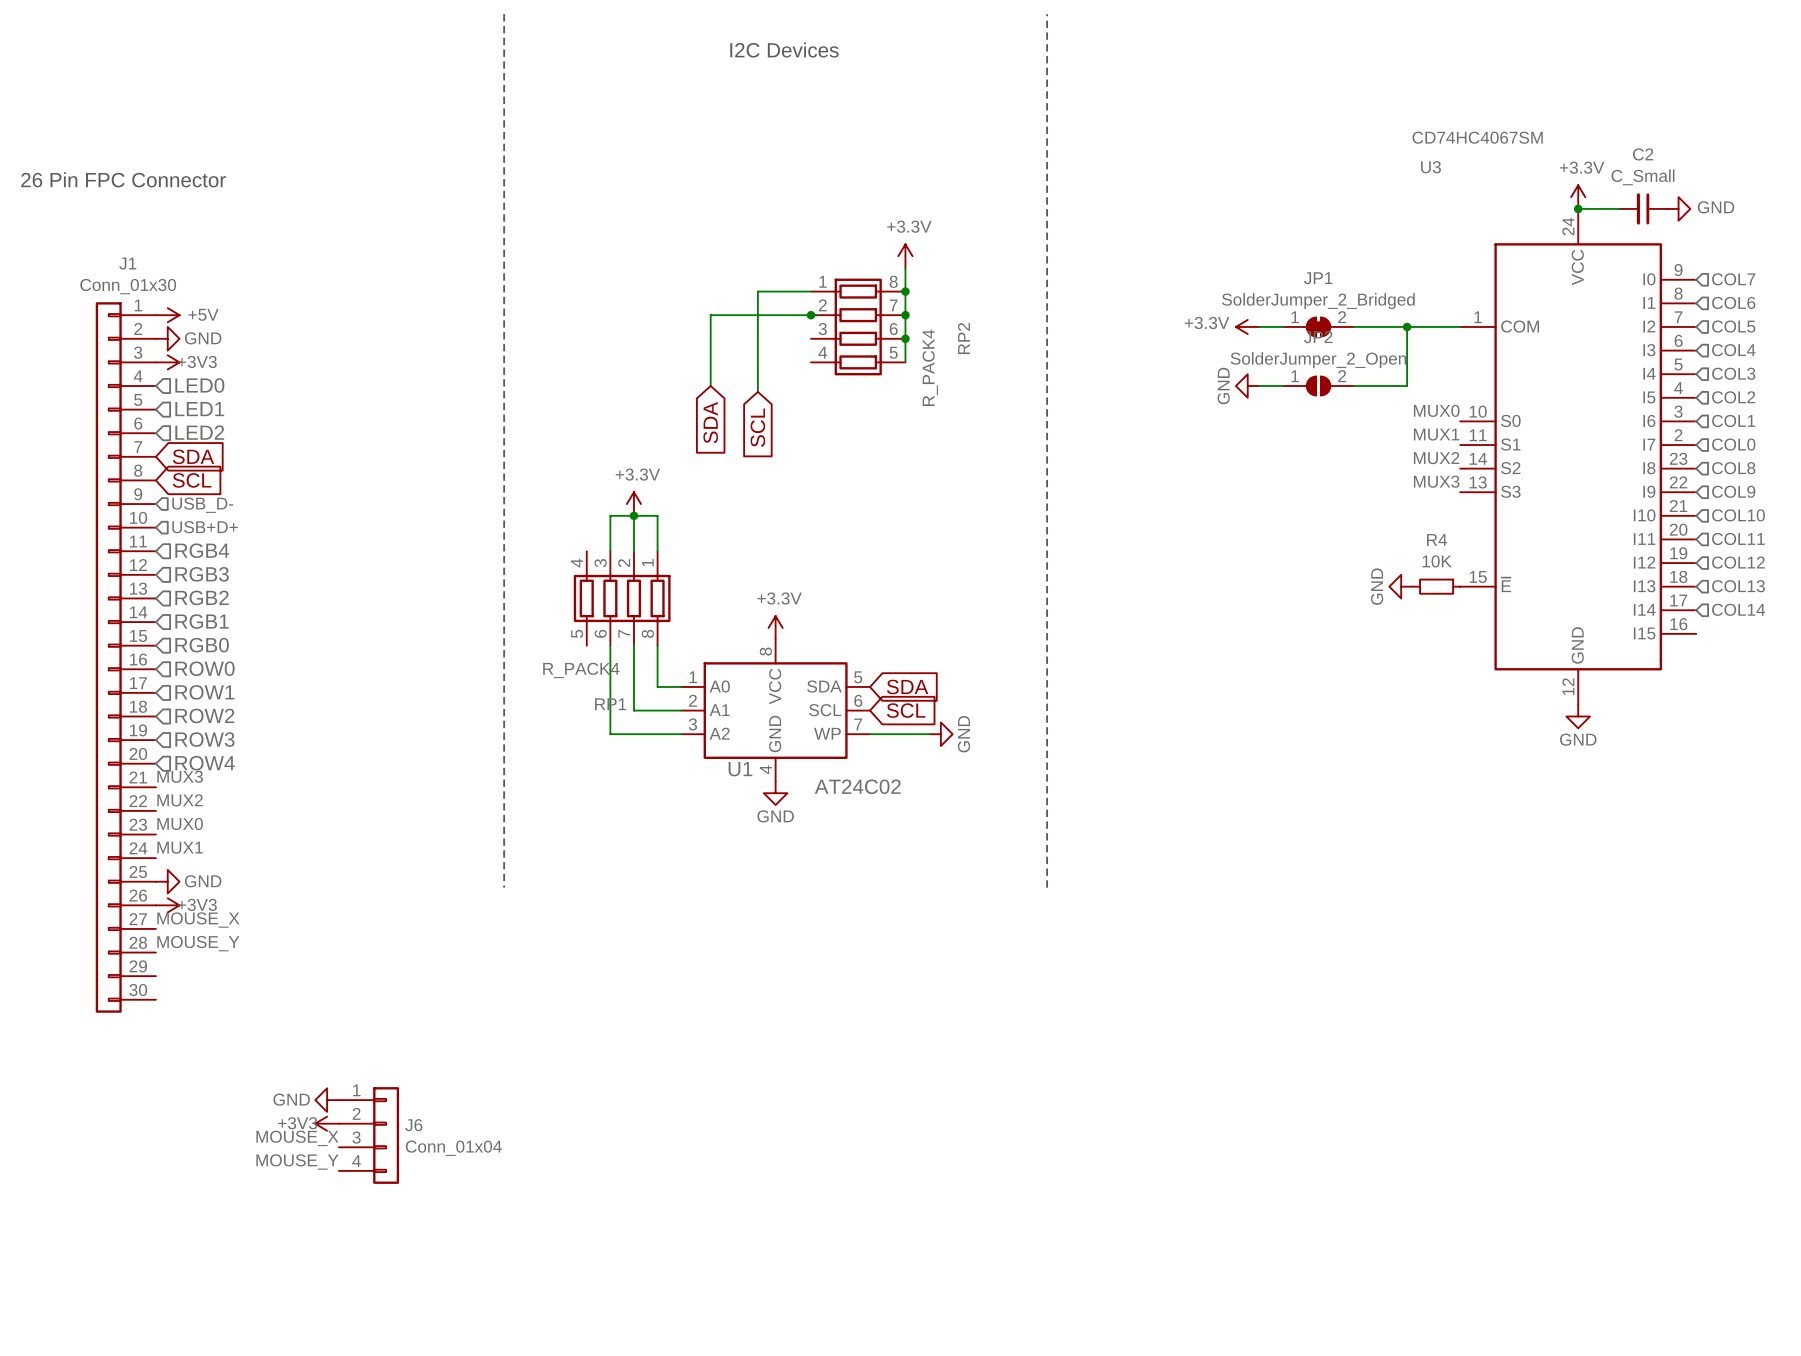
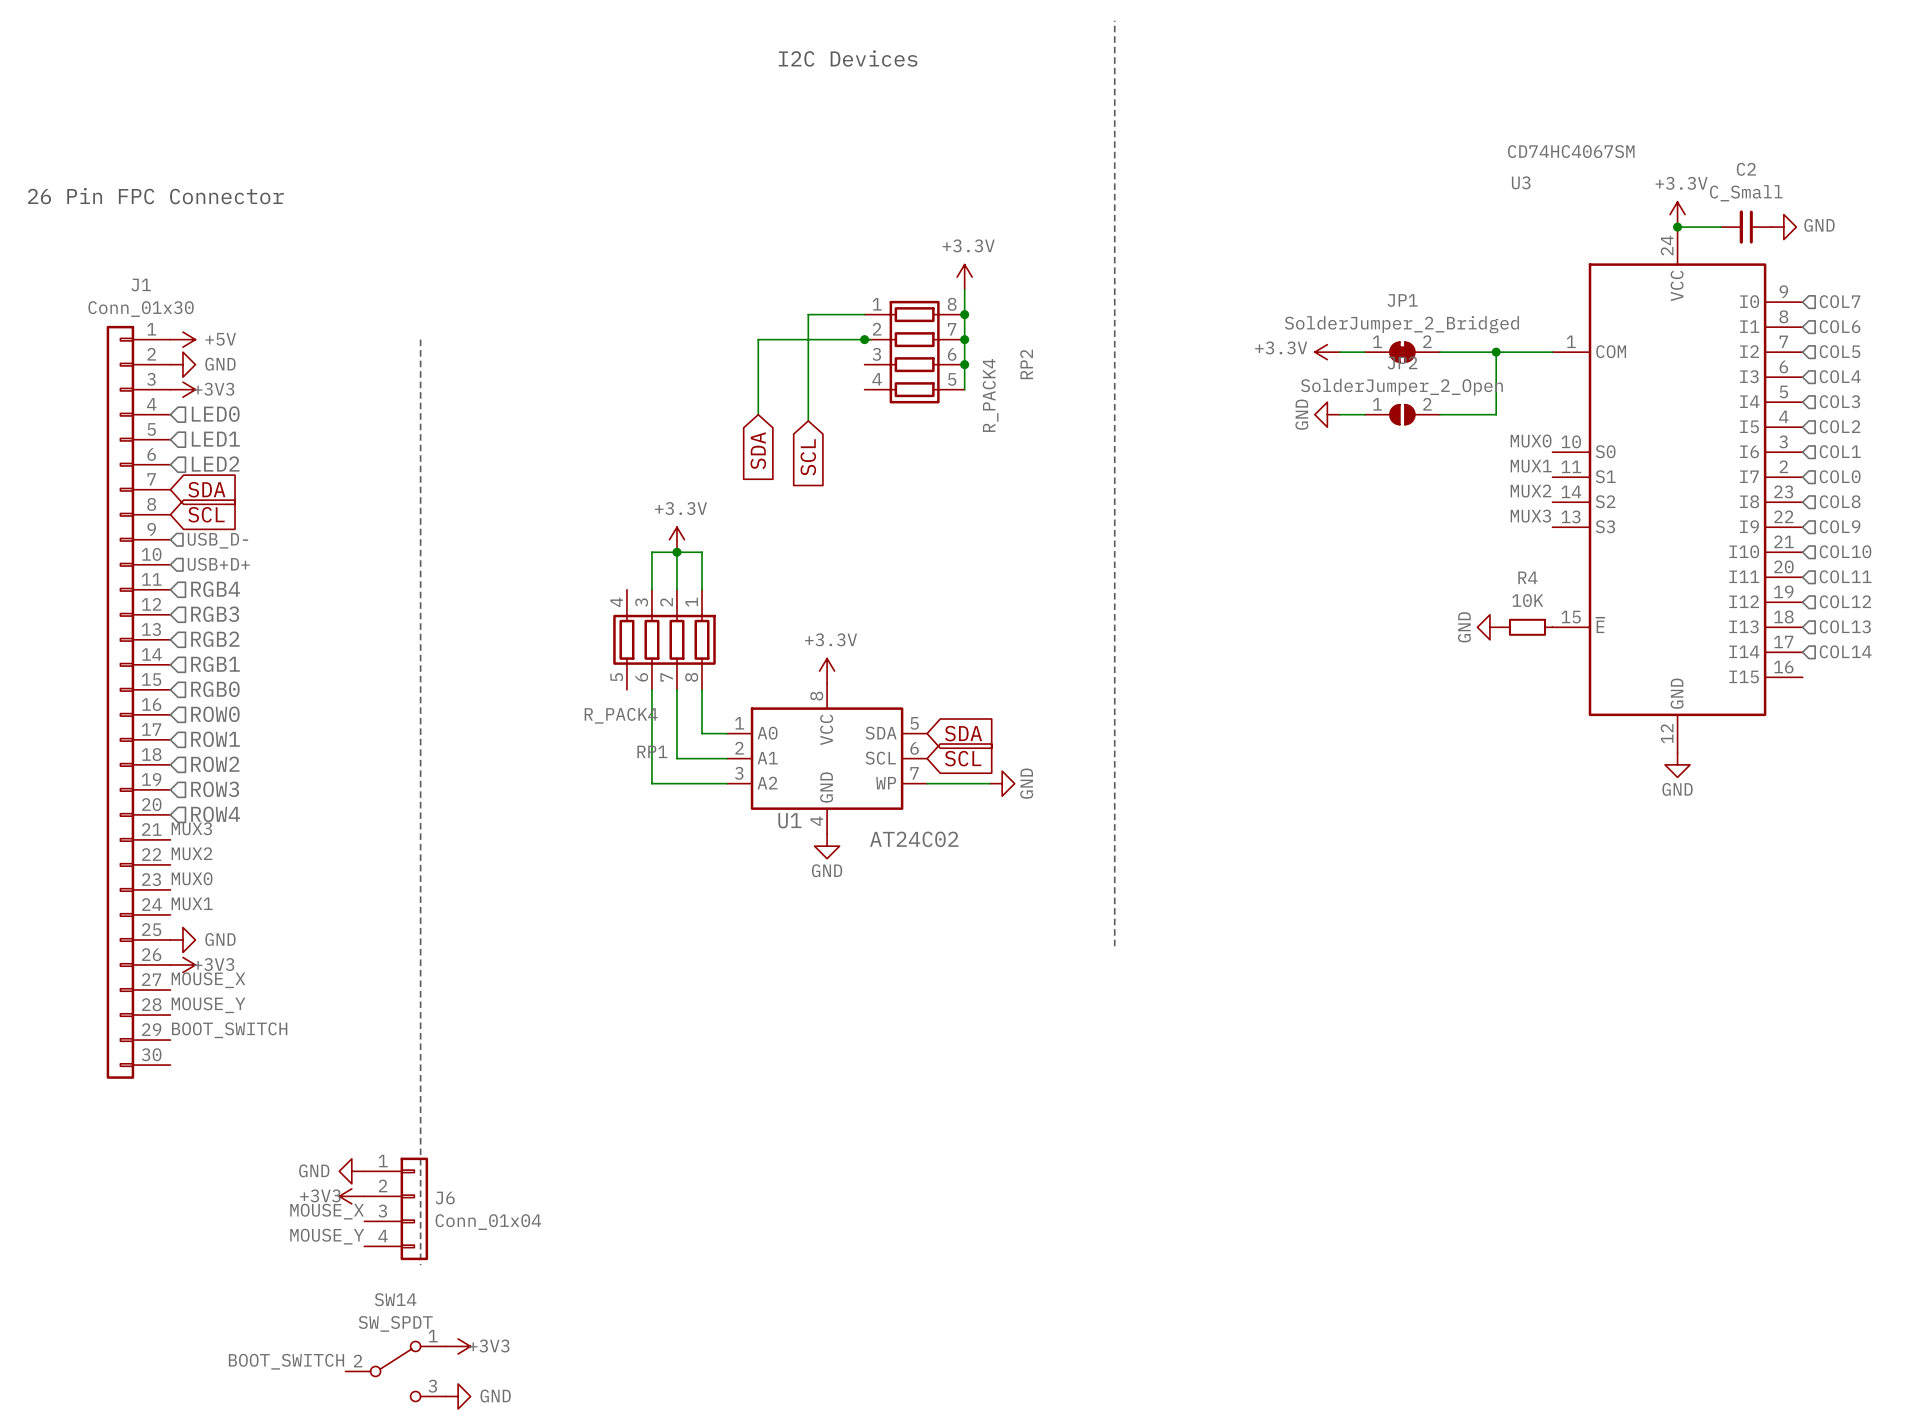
line: (504, 14) (504, 887) -> none
line: none -> (420, 339) (420, 1265)
label: none -> BOOT_SWITCH (229, 1030)
power symbol: none -> +3V3 (458, 1346)
label: none -> BOOT_SWITCH (286, 1361)
SW14: none -> SW_SPDT (395, 1371)
power symbol: none -> GND (458, 1396)

